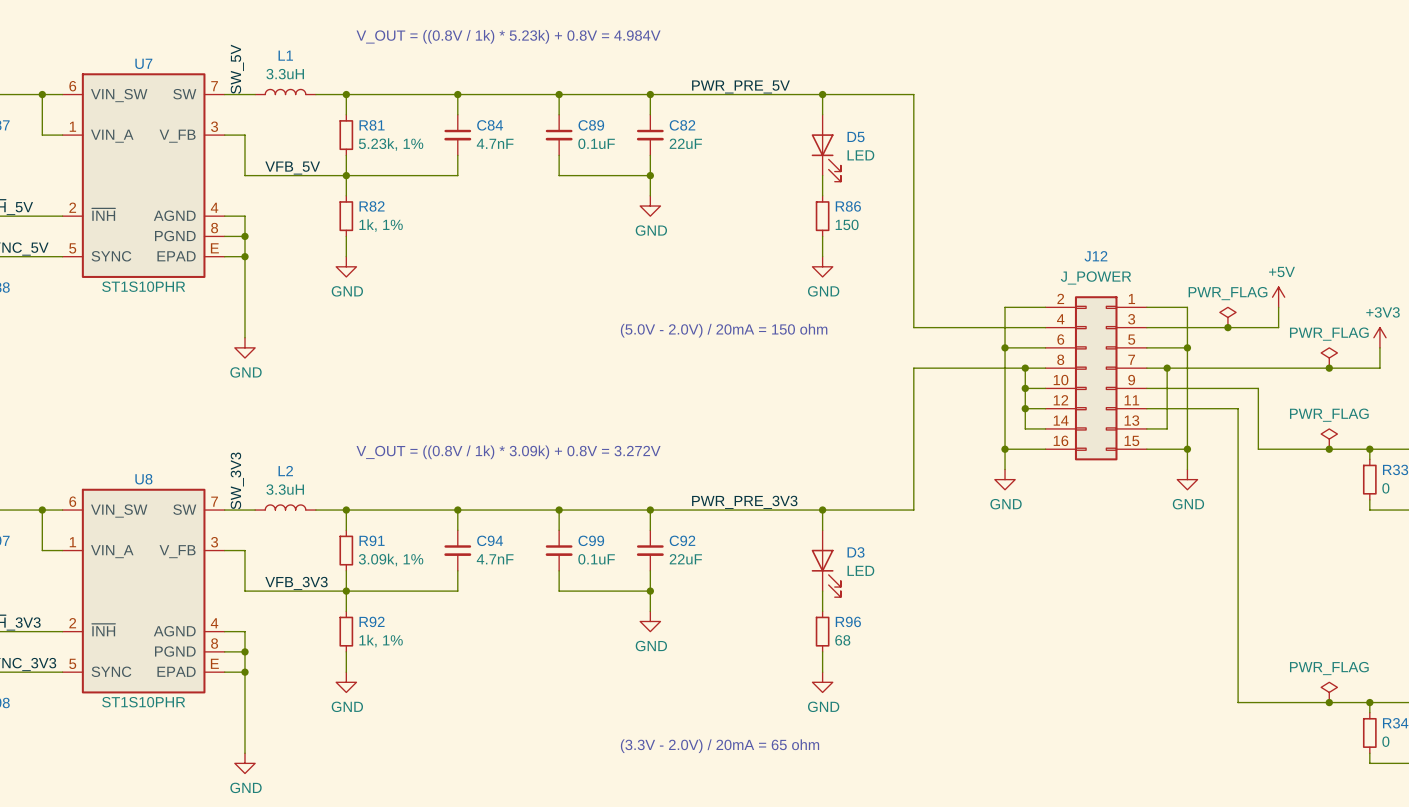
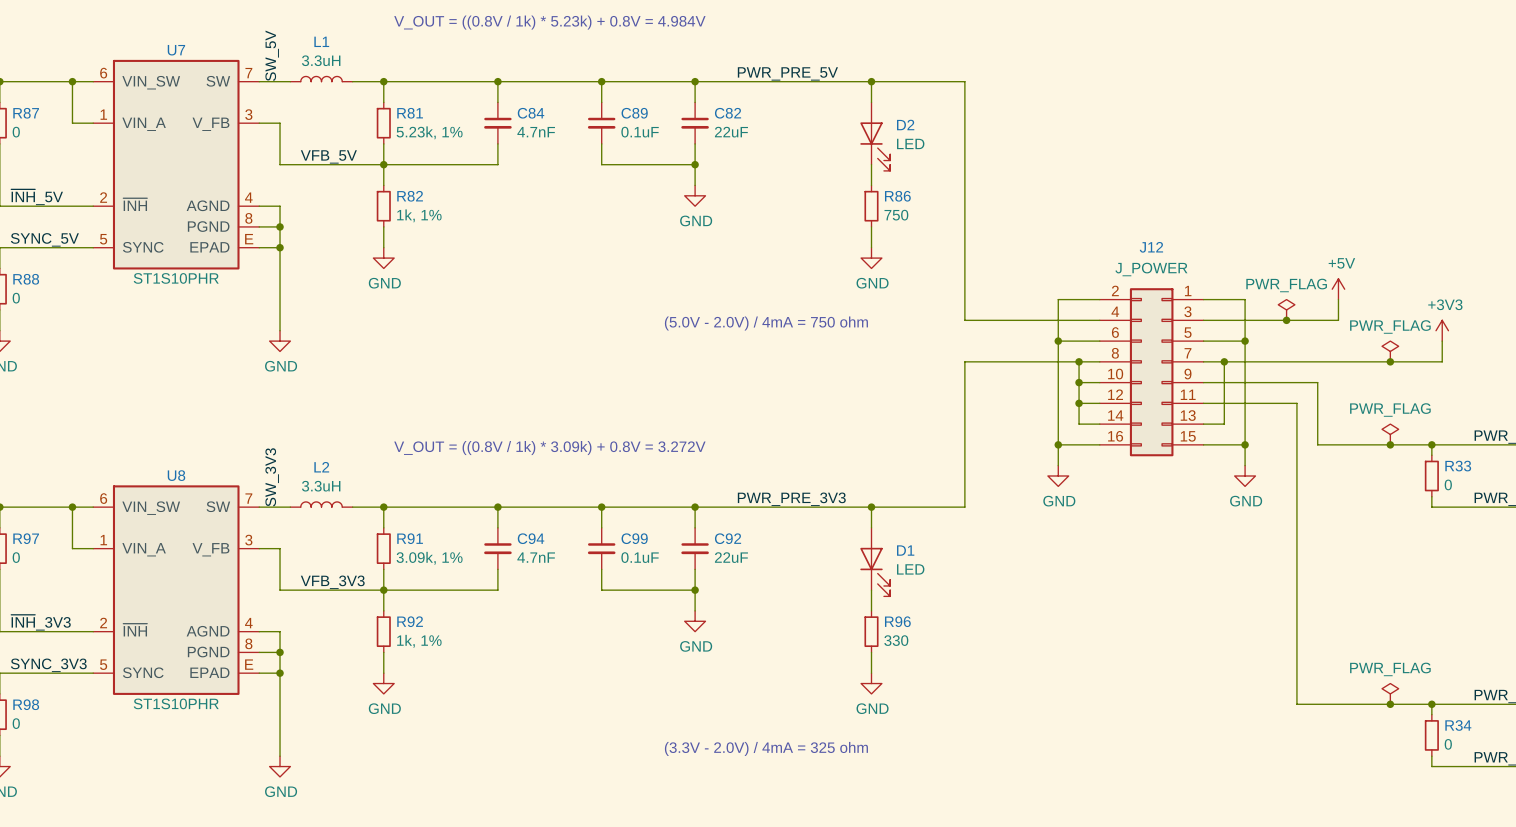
D5 name: D5 (856, 137) -> D2 (905, 125)
R86 value: 150 (847, 224) -> 750 (896, 215)
text: (5.0V - 2.0V) / 20mA = 150 ohm (724, 330) -> (5.0V - 2.0V) / 4mA = 750 ohm (766, 323)
D3 name: D3 (856, 552) -> D1 (905, 550)
R96 value: 68 (842, 640) -> 330 (896, 640)
text: (3.3V - 2.0V) / 20mA = 65 ohm (719, 746) -> (3.3V - 2.0V) / 4mA = 325 ohm (766, 748)

